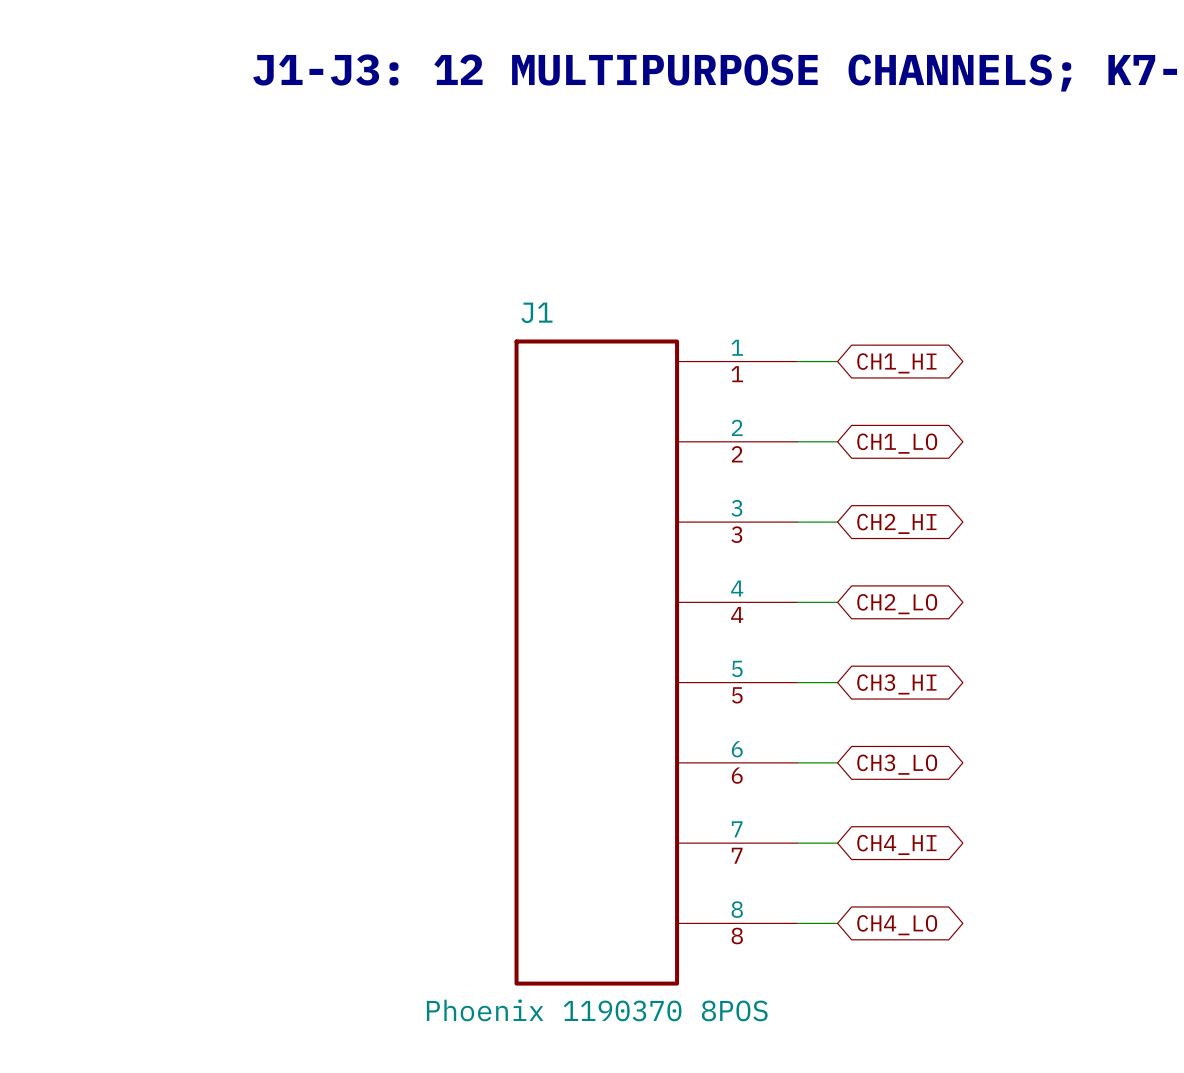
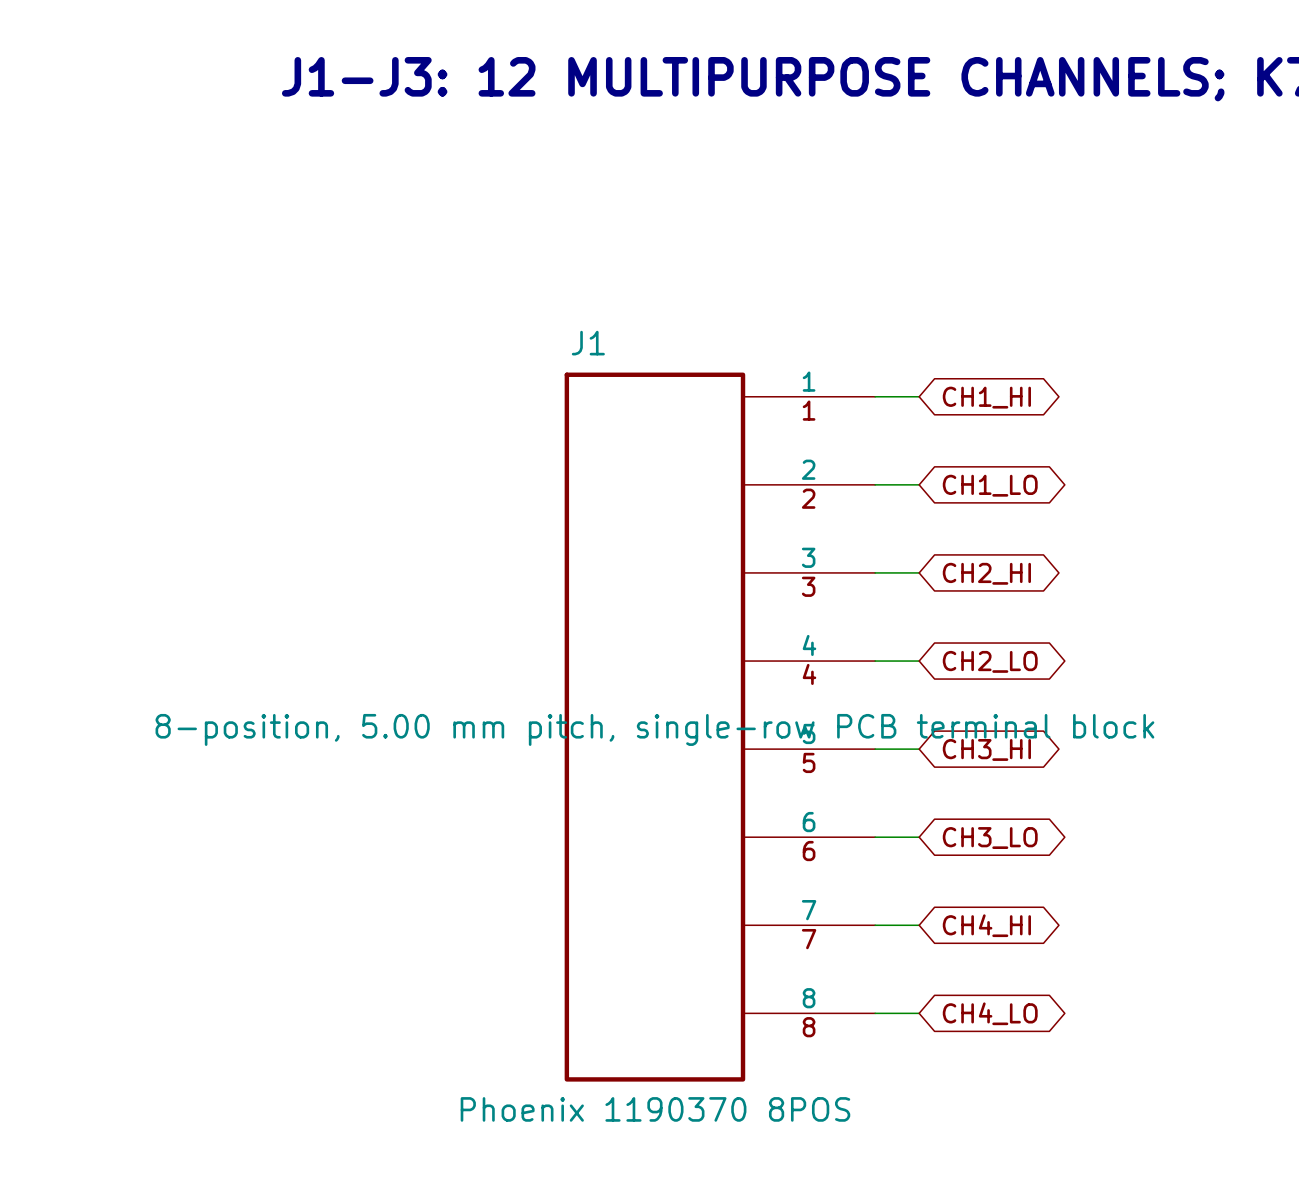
J1 text: none -> 8-position, 5.00 mm pitch, single-row PCB terminal block (654, 729)

